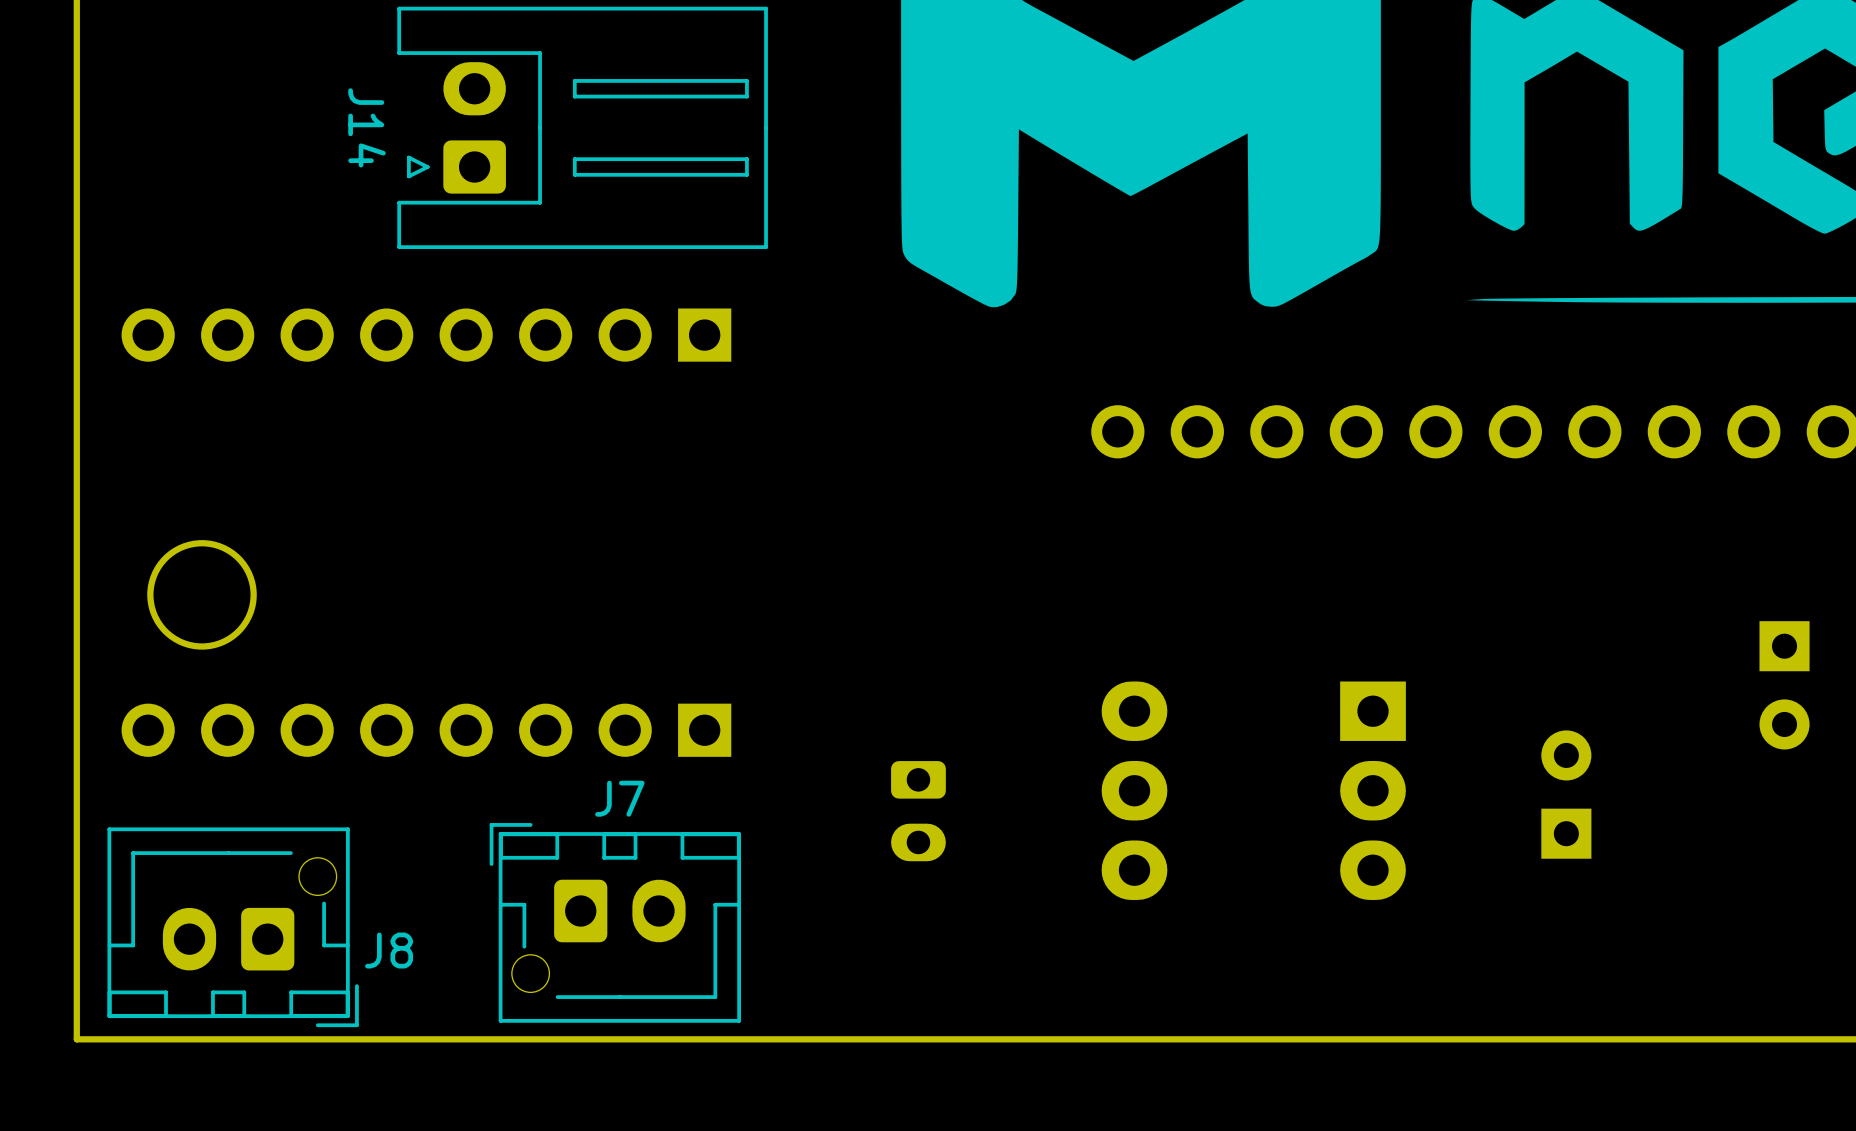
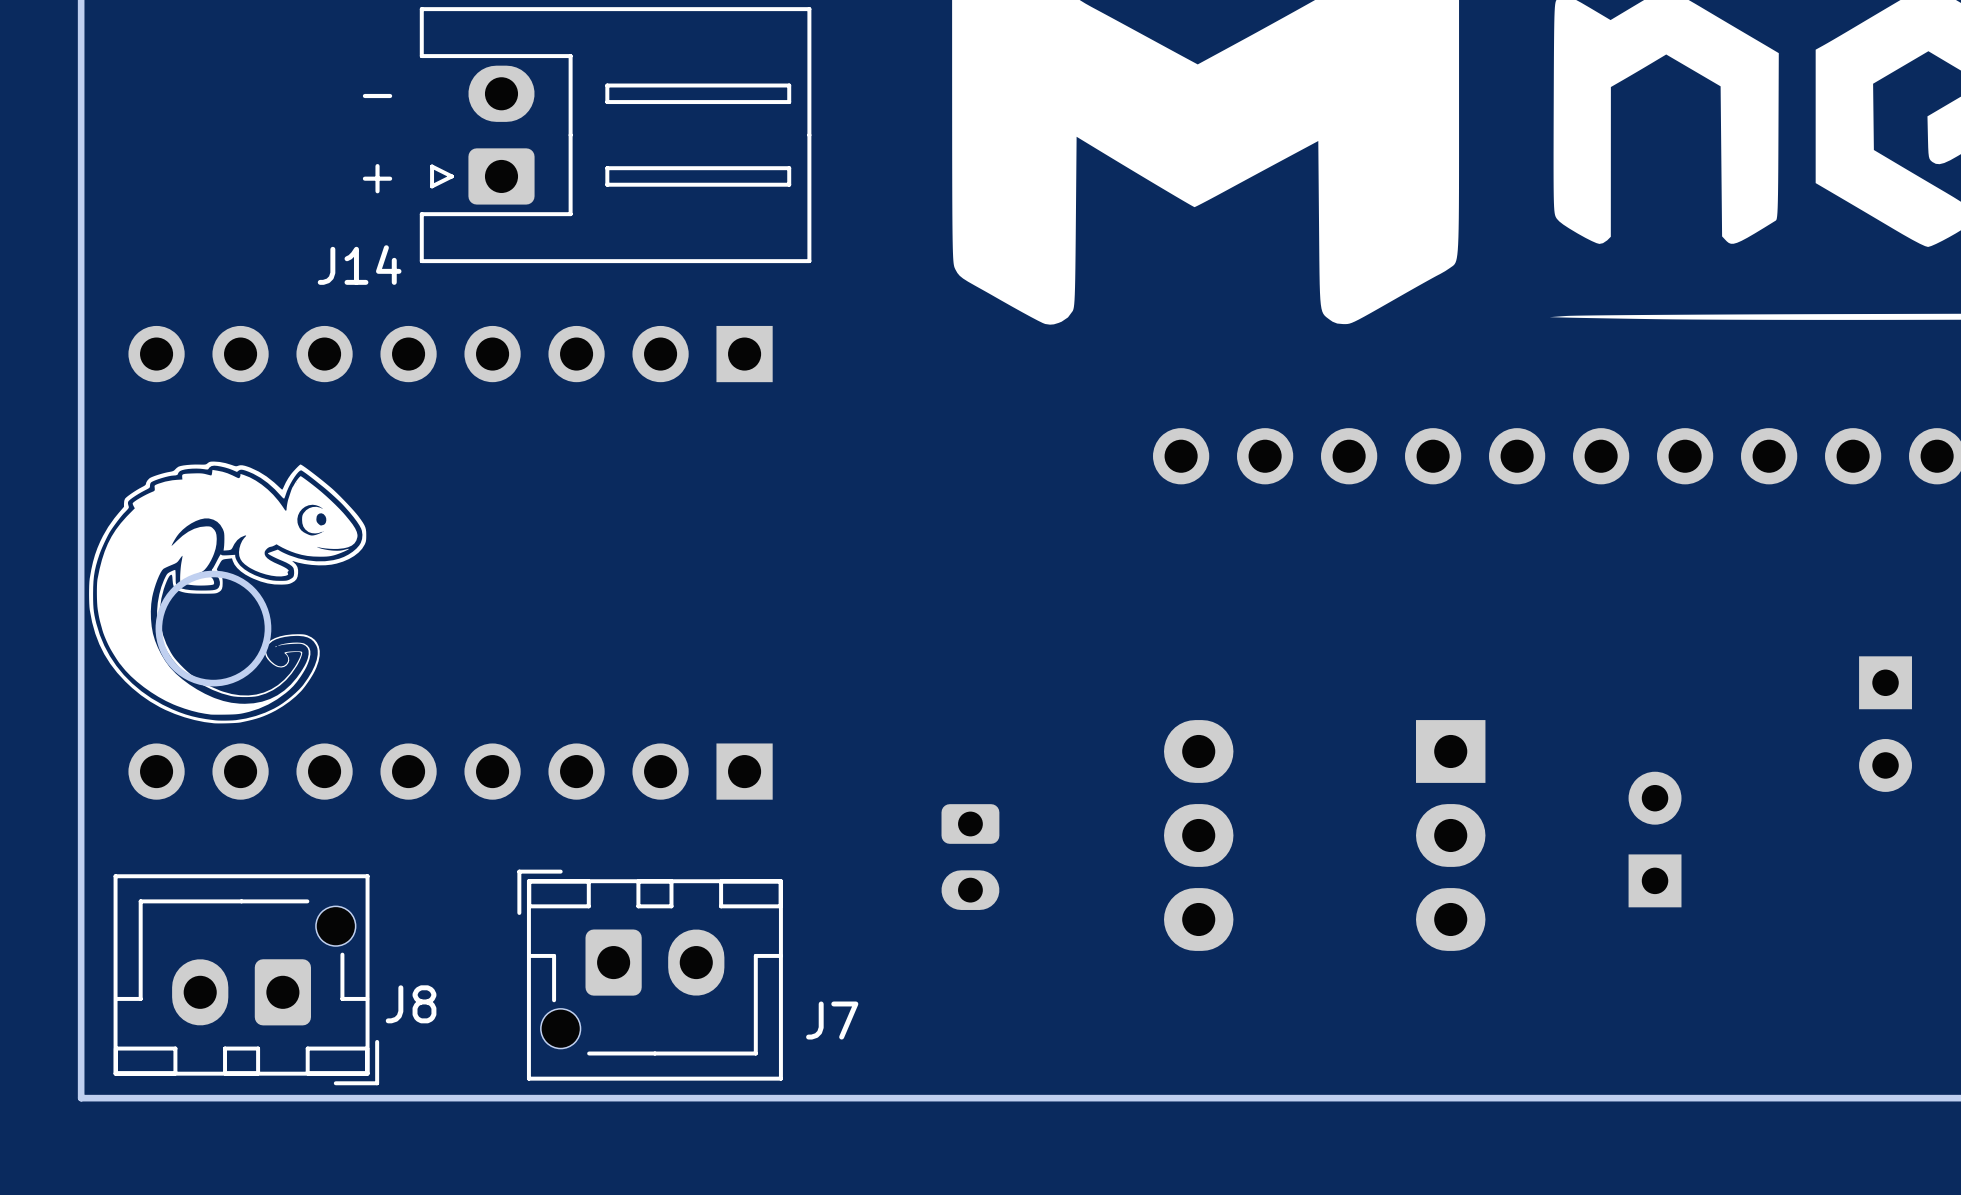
text: none -> - (377, 96)
J14 name rotation: 0° (366, 127) -> 90° counterclockwise (359, 265)
J14 name position: J14 (366, 127) -> J14 (359, 265)
text: none -> + (377, 178)
drawing: none -> [89, 461, 367, 724]
J7 name position: J7 (619, 798) -> J7 (832, 1020)

